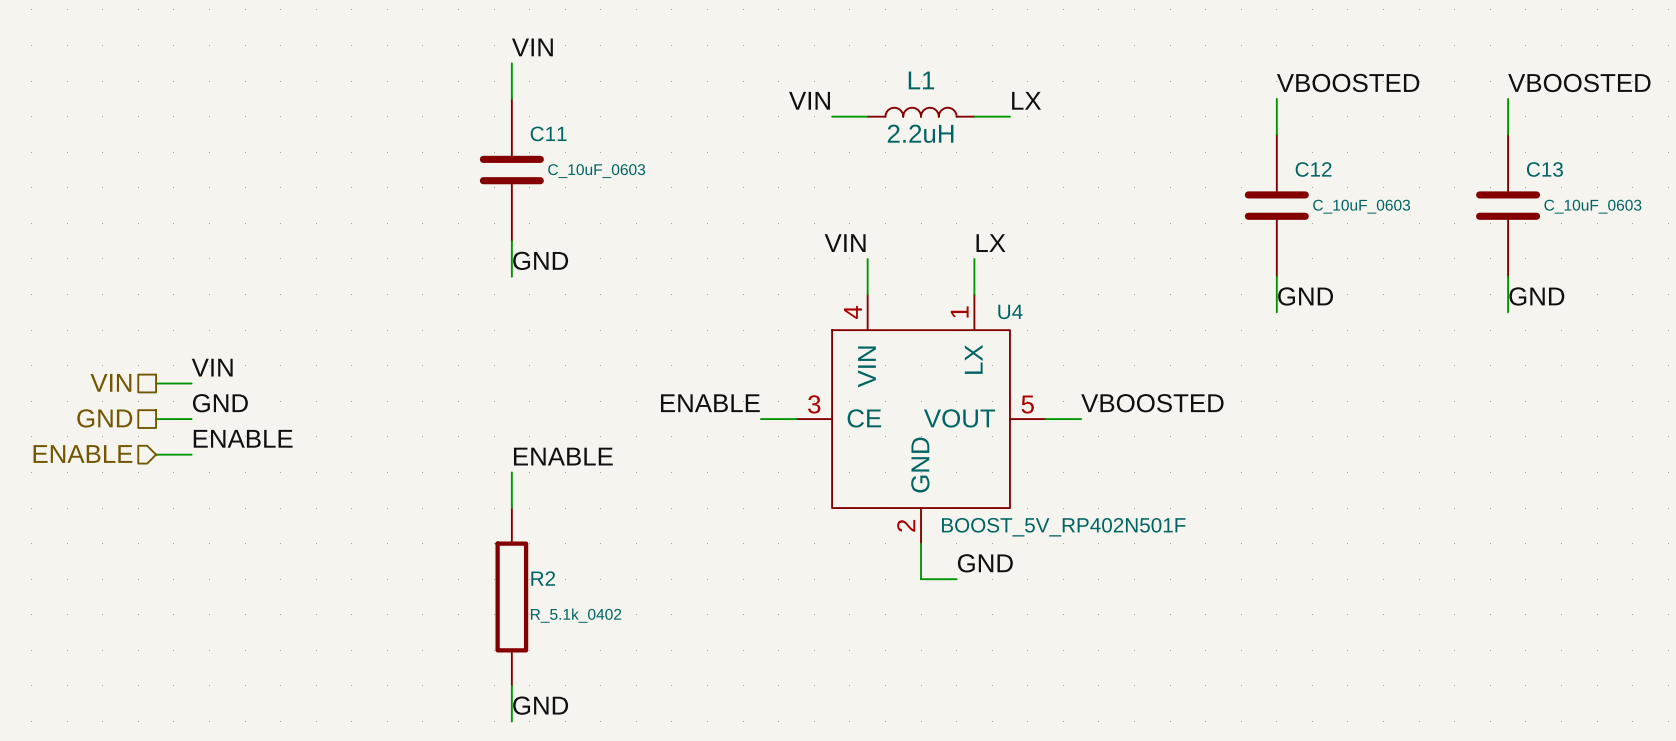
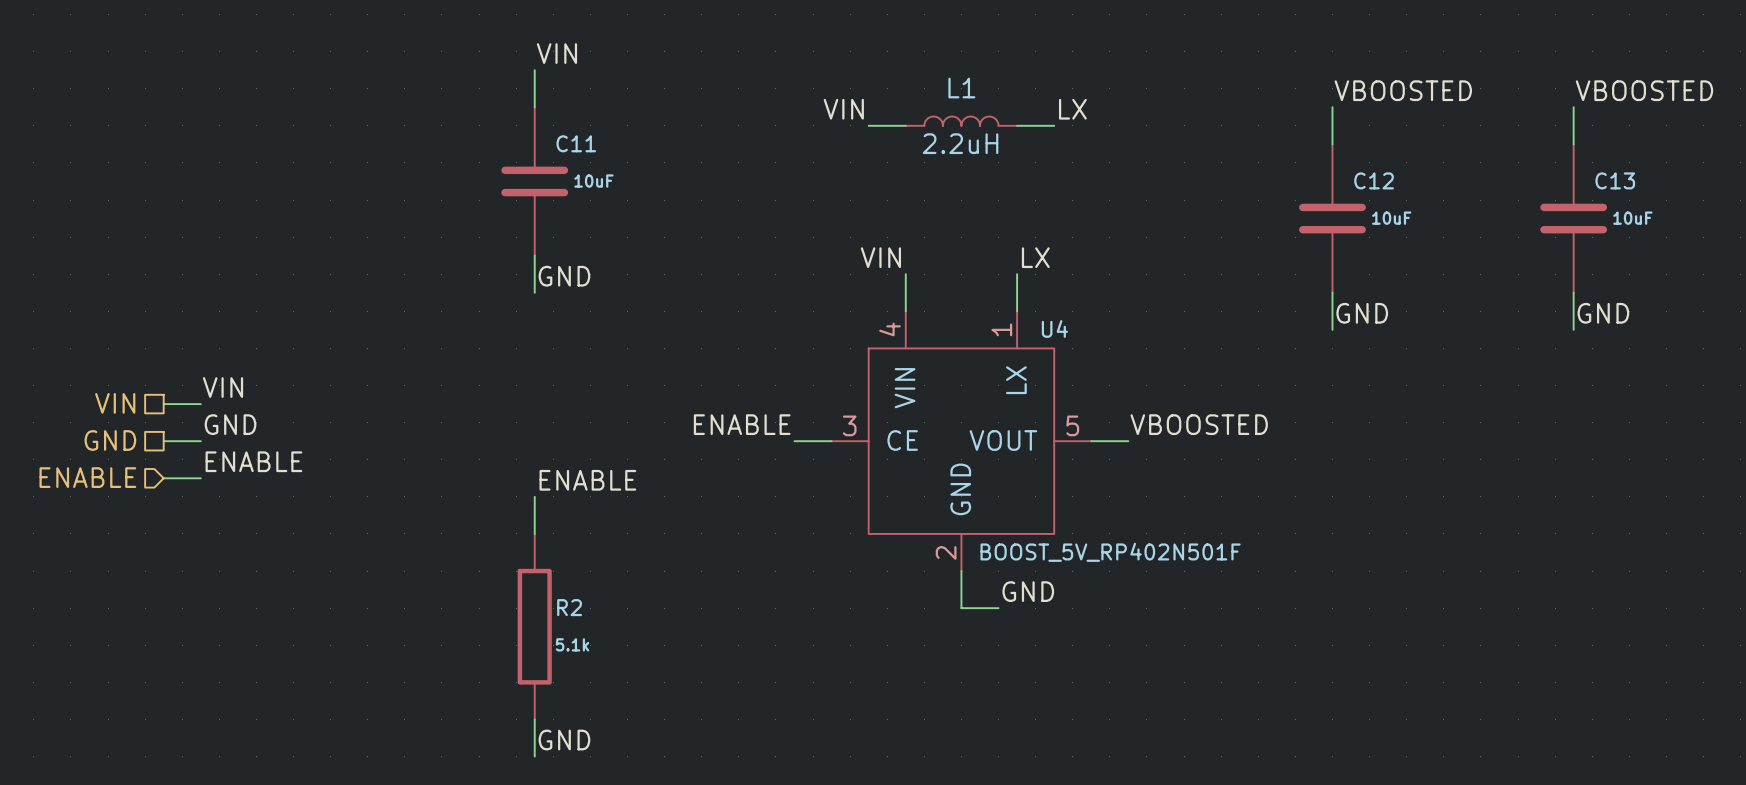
C11 value: C_10uF_0603 (596, 171) -> 10uF (593, 181)
C12 value: C_10uF_0603 (1361, 206) -> 10uF (1391, 218)
C13 value: C_10uF_0603 (1592, 206) -> 10uF (1632, 218)
R2 value: R_5.1k_0402 (576, 615) -> 5.1k (572, 644)

